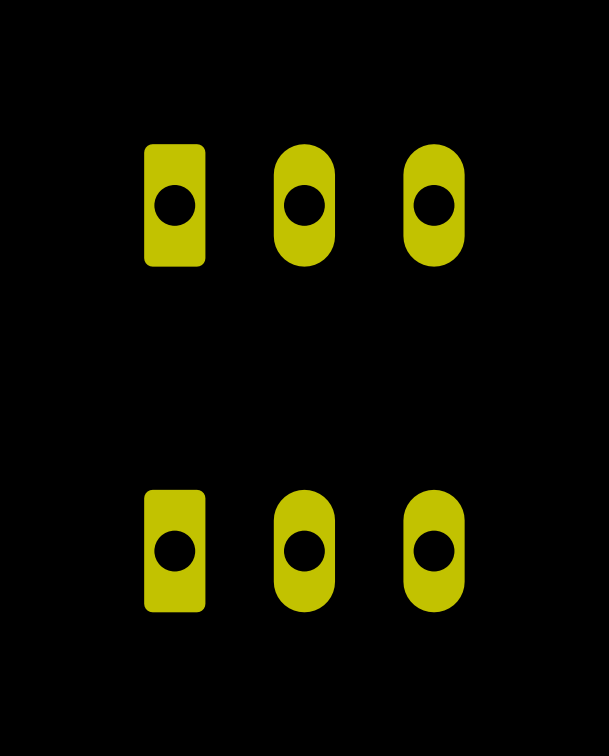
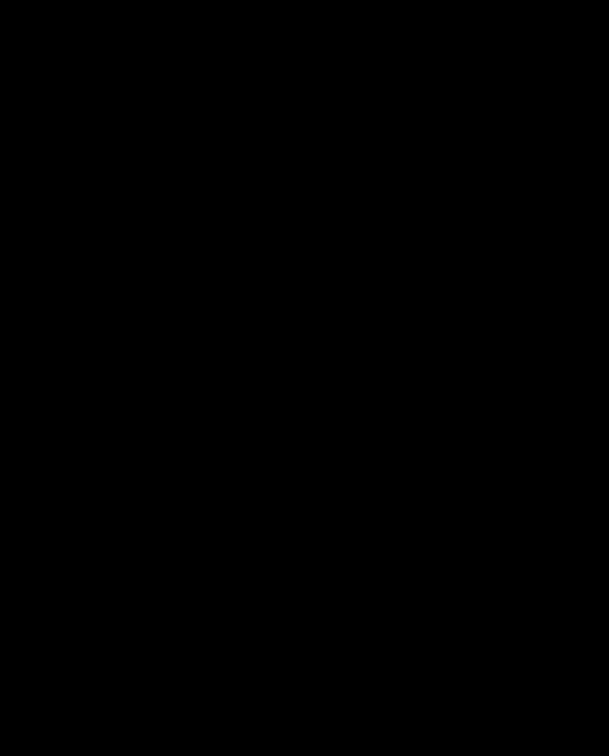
part: (304, 205) -> none
part: (304, 551) -> none

